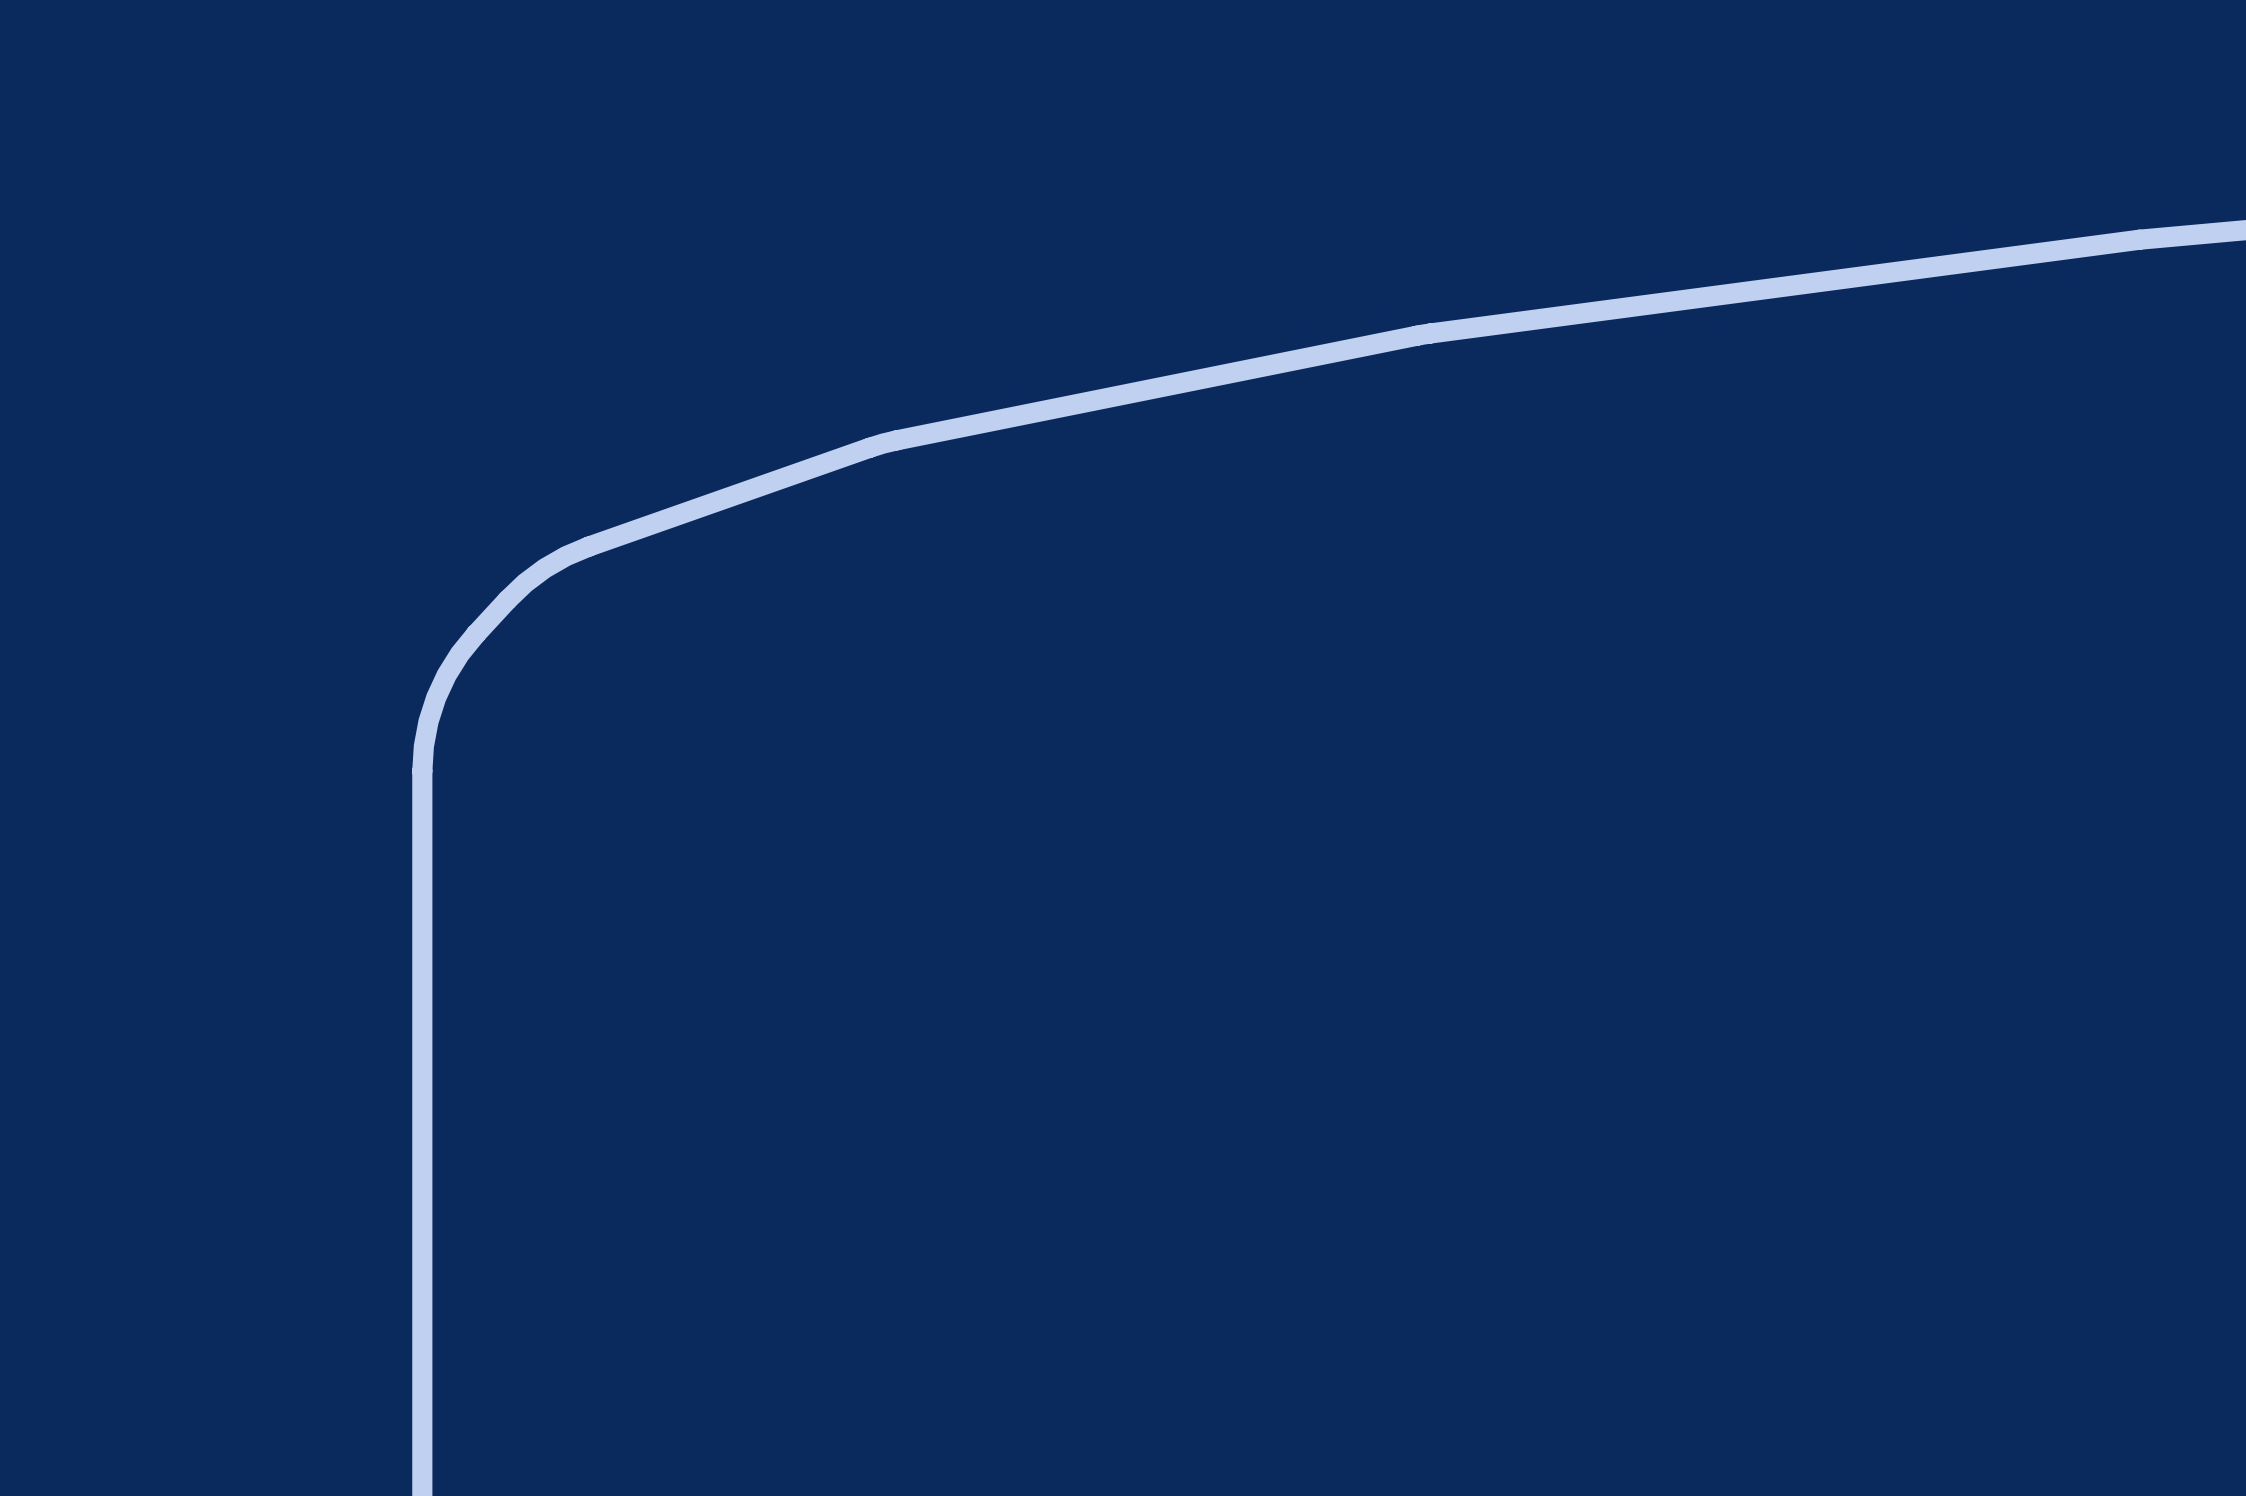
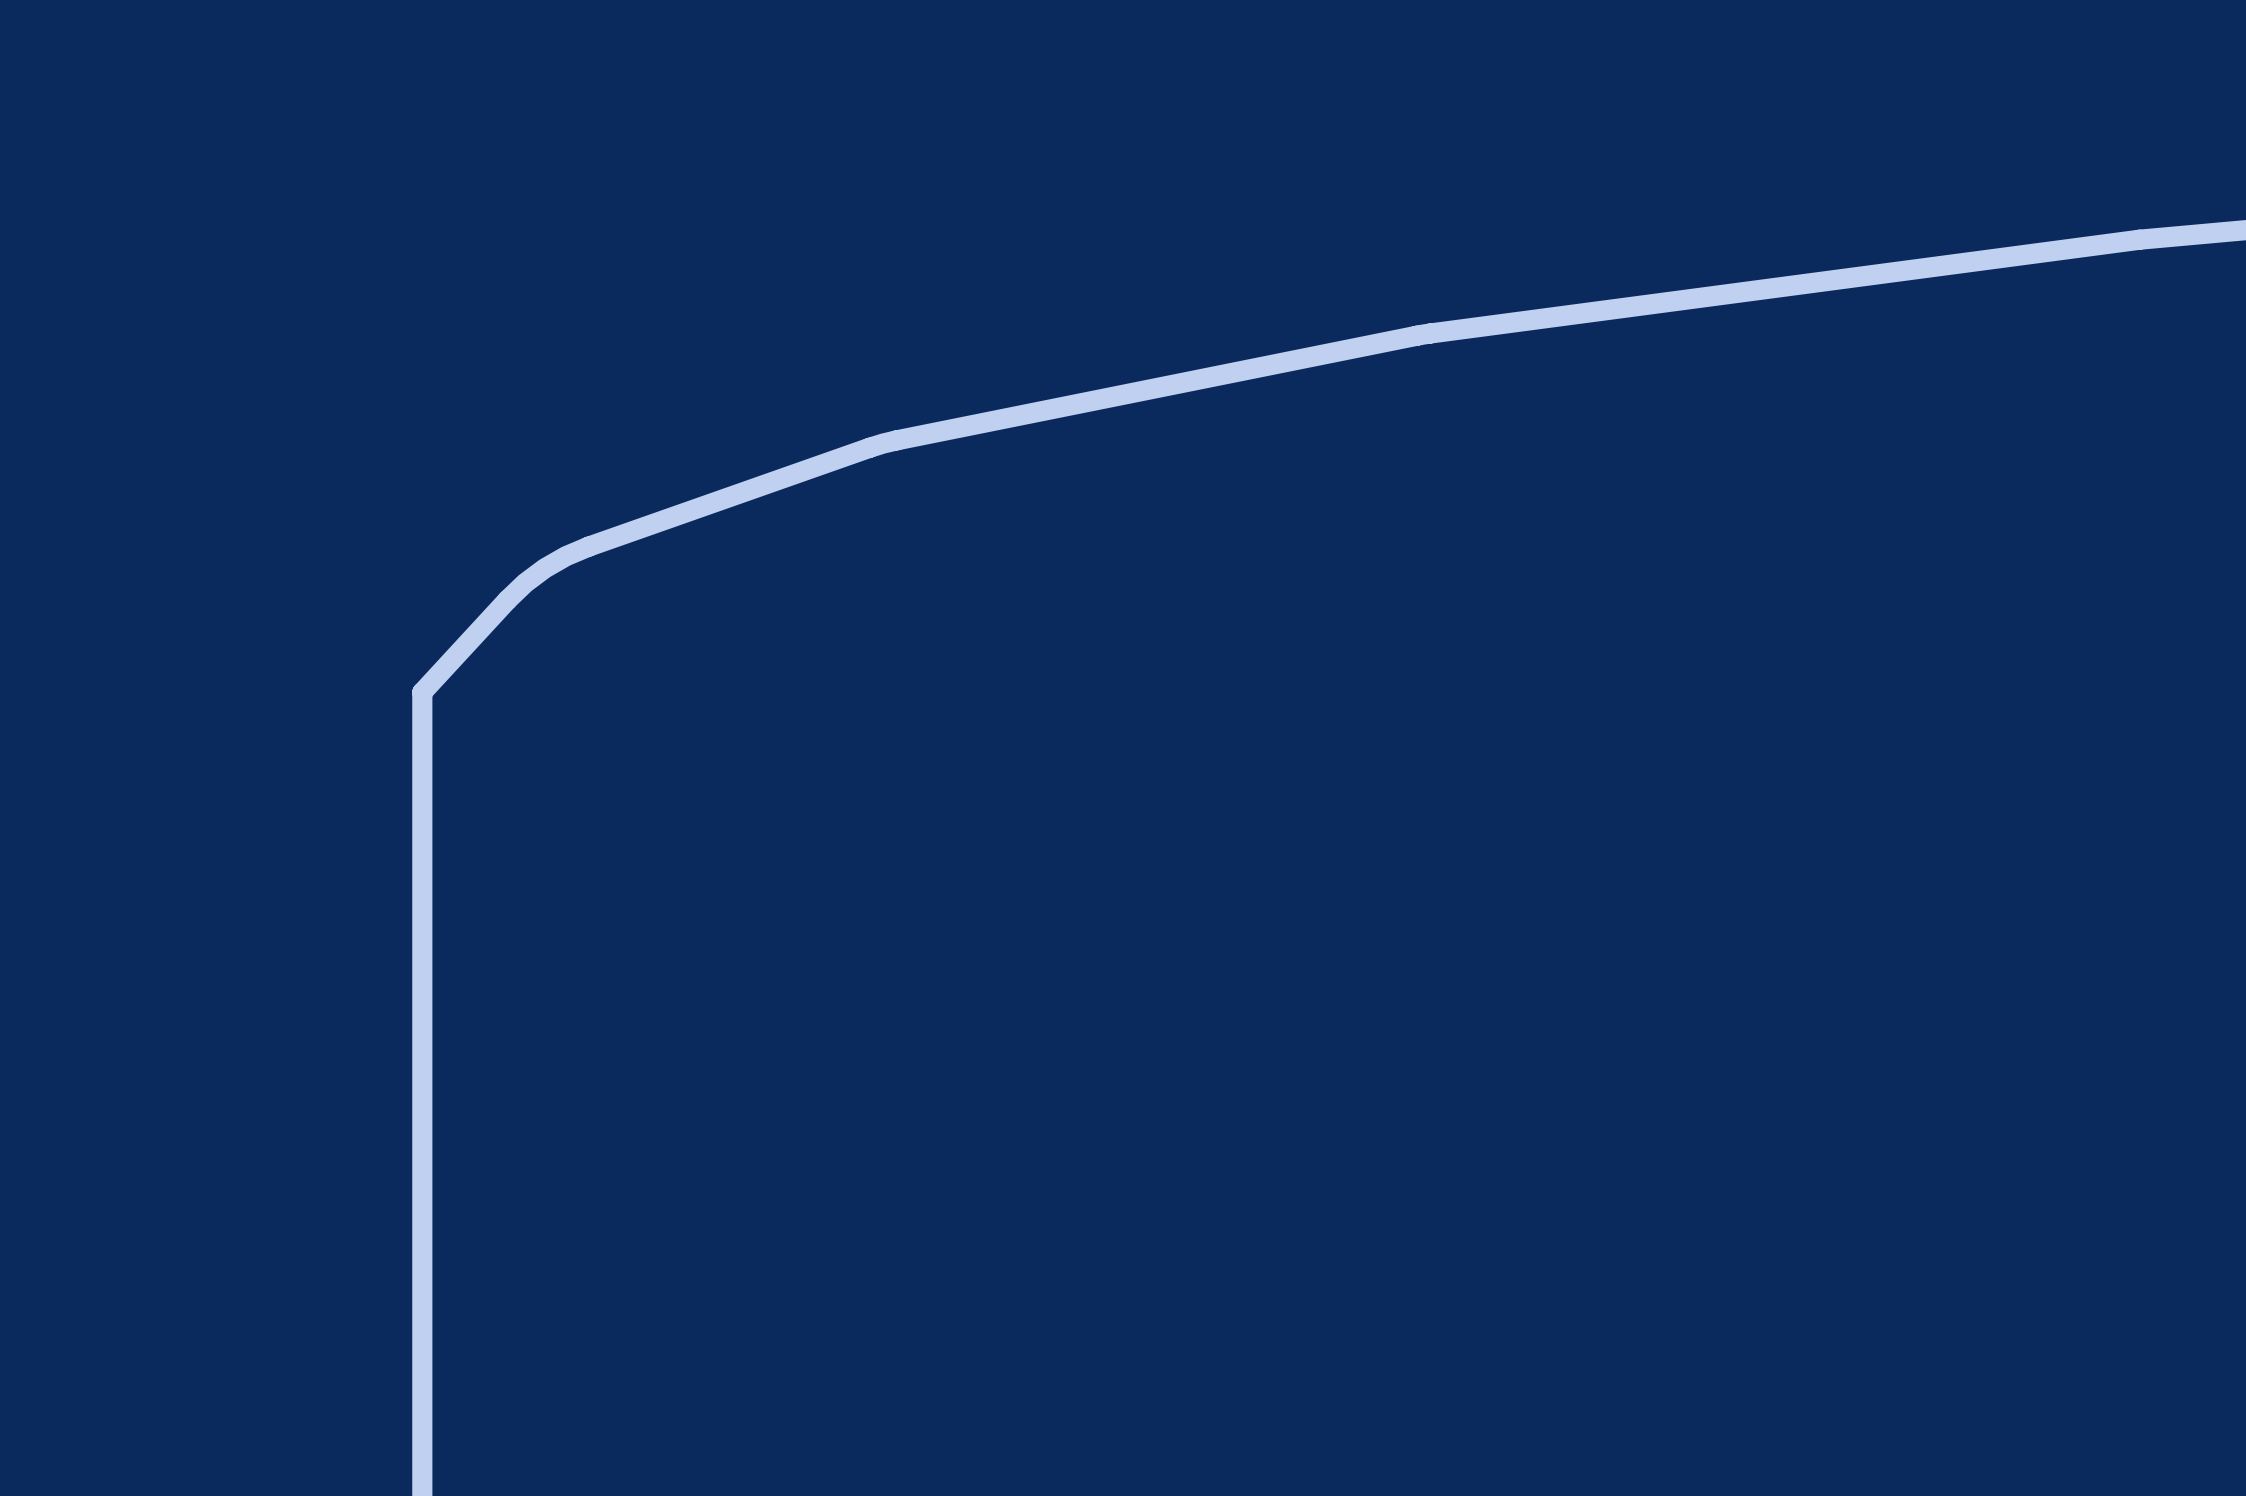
board edge: (475, 634) (459, 653) (446, 675) (436, 697) (428, 721) (423, 746) (422, 771) -> (475, 634) (422, 692) (422, 771)

